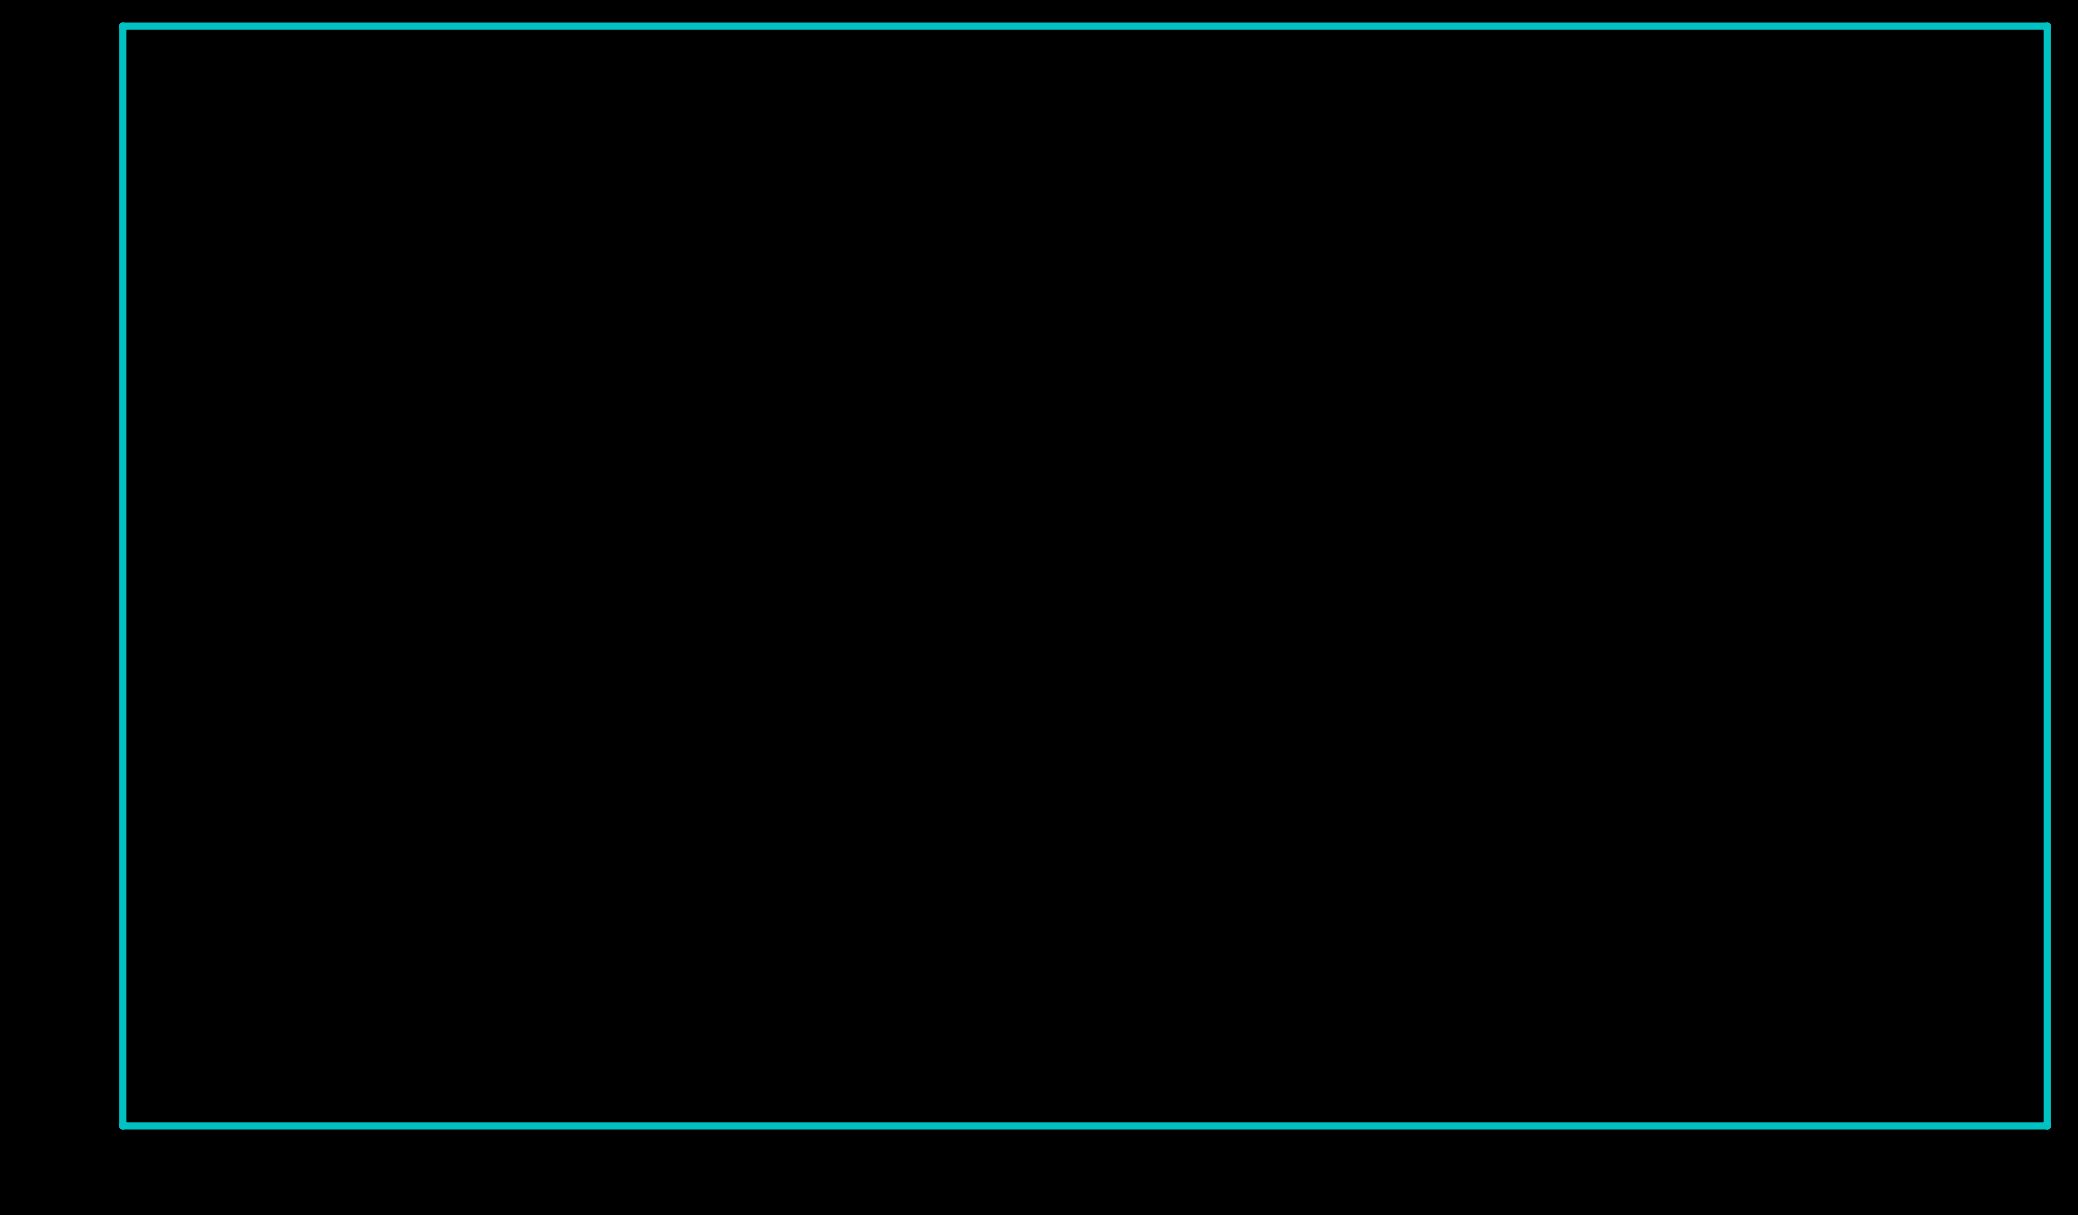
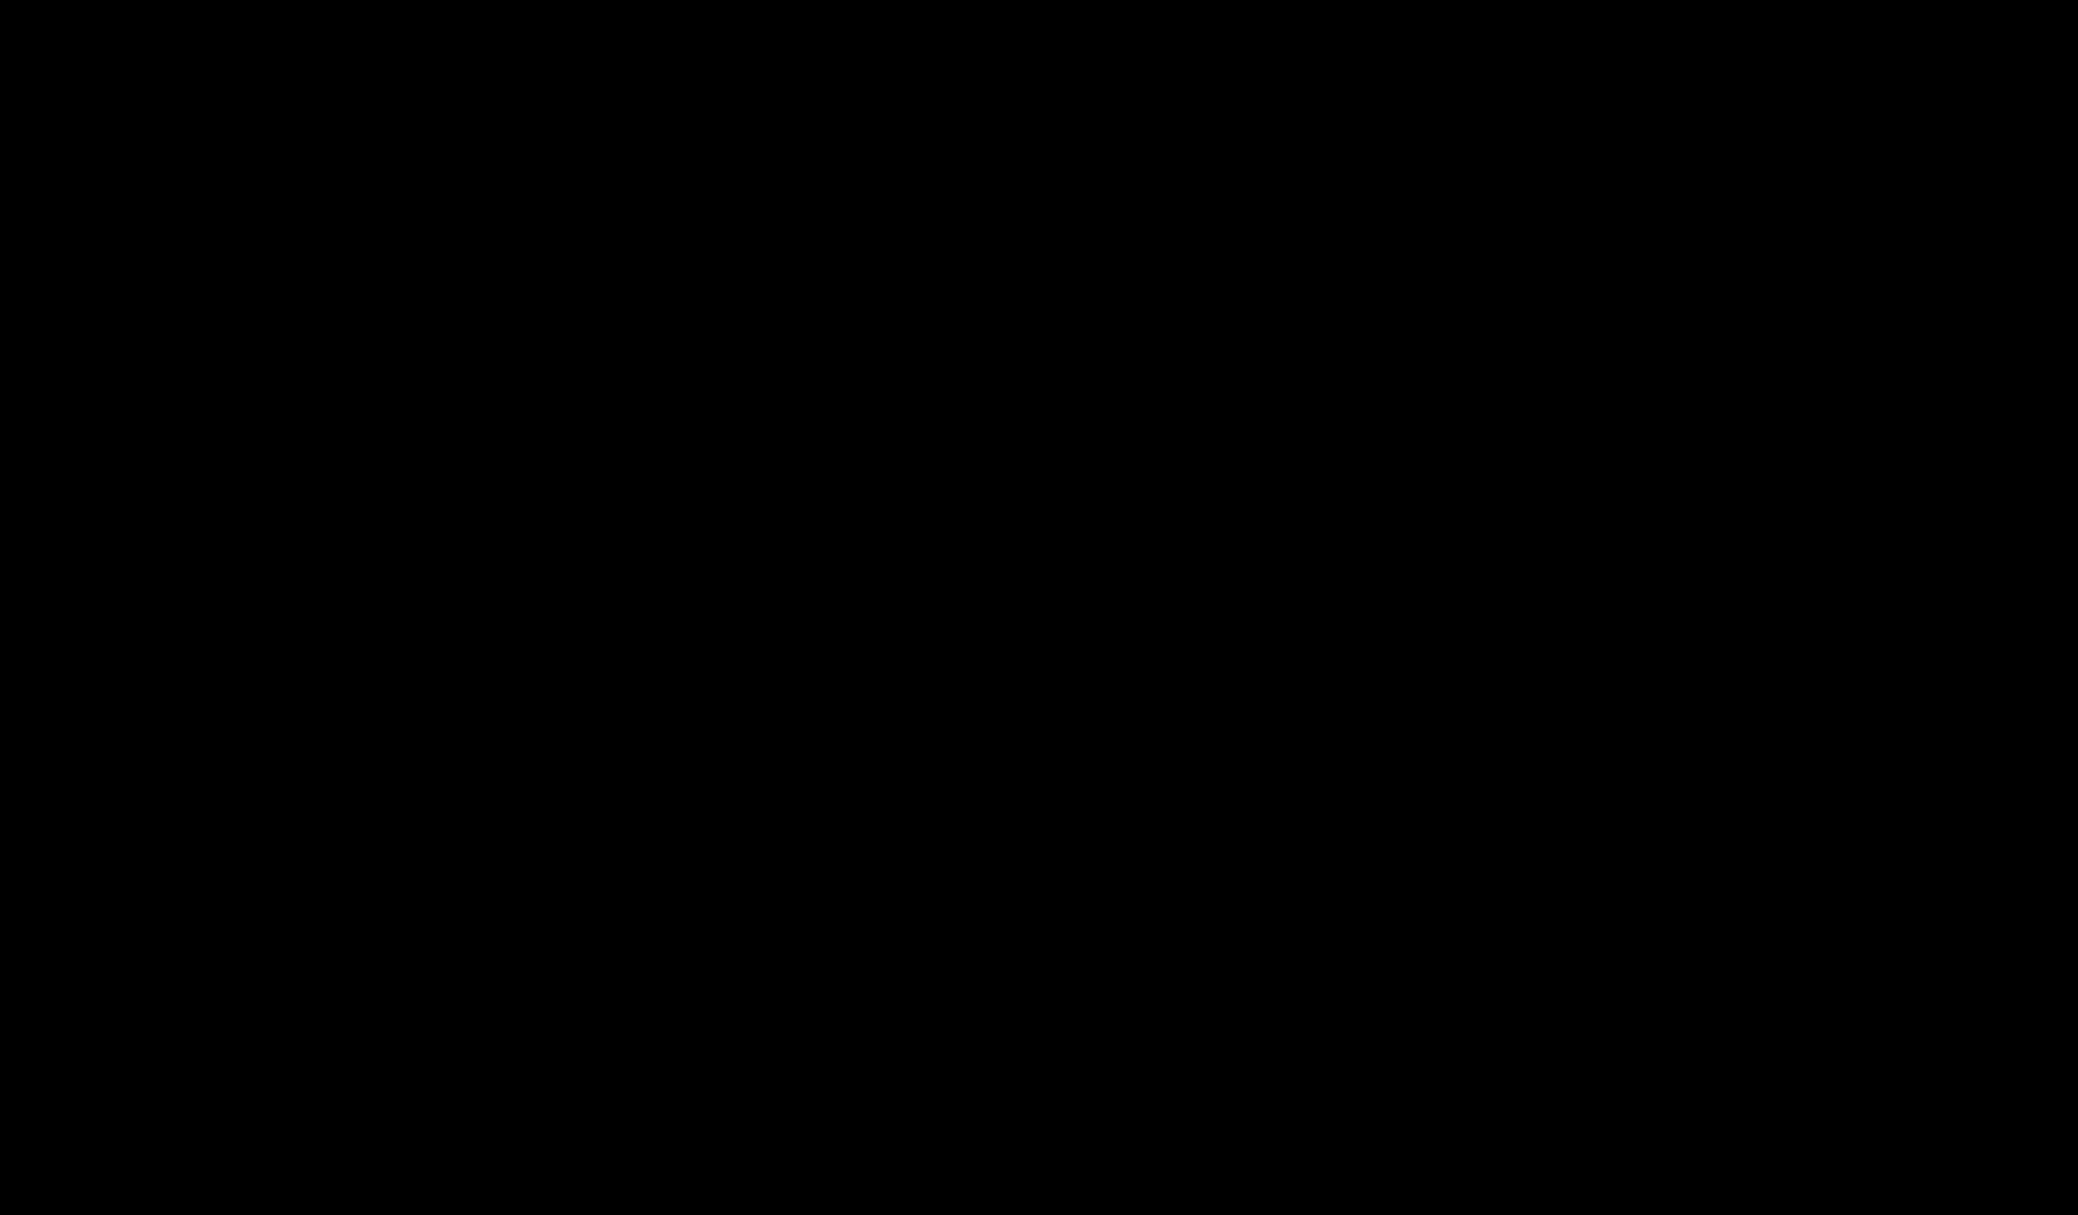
line: (2047, 26) (2047, 1125) (122, 1125) (122, 26) (2047, 26) -> none

